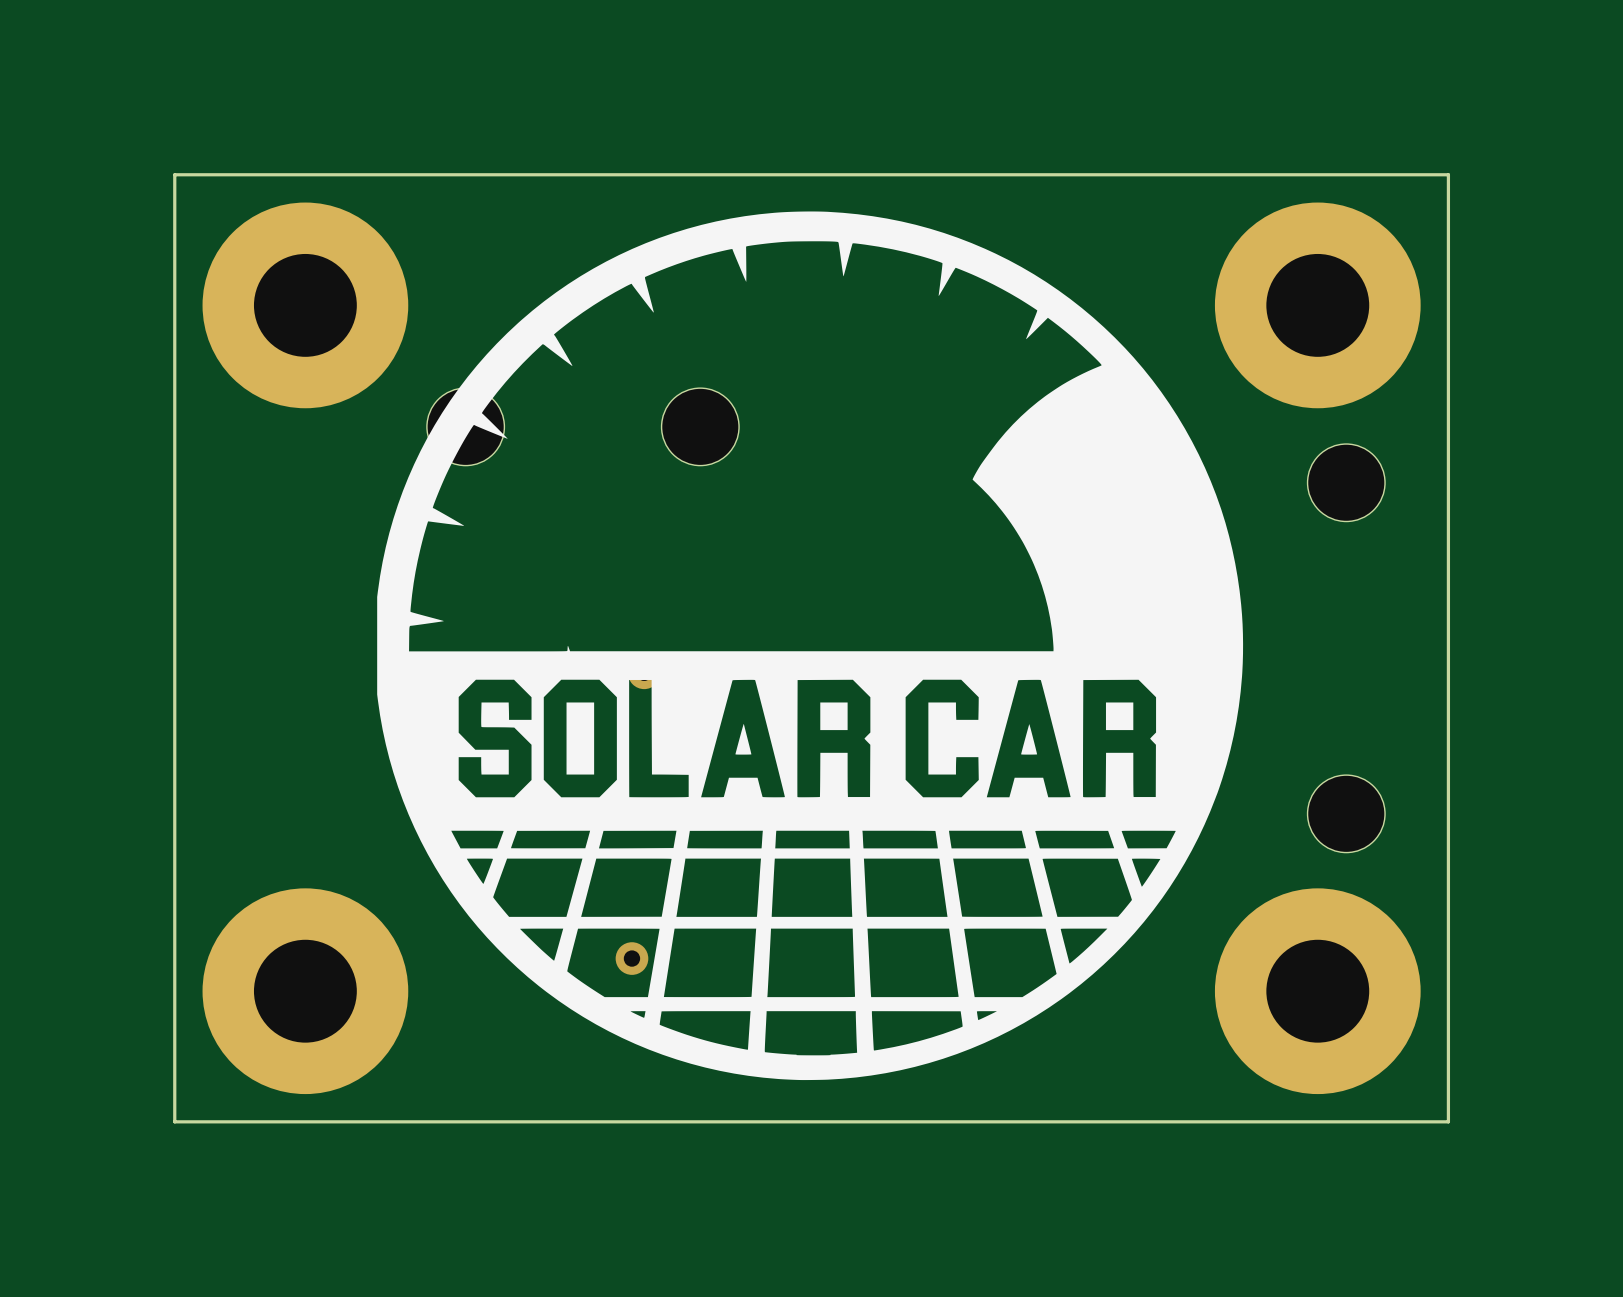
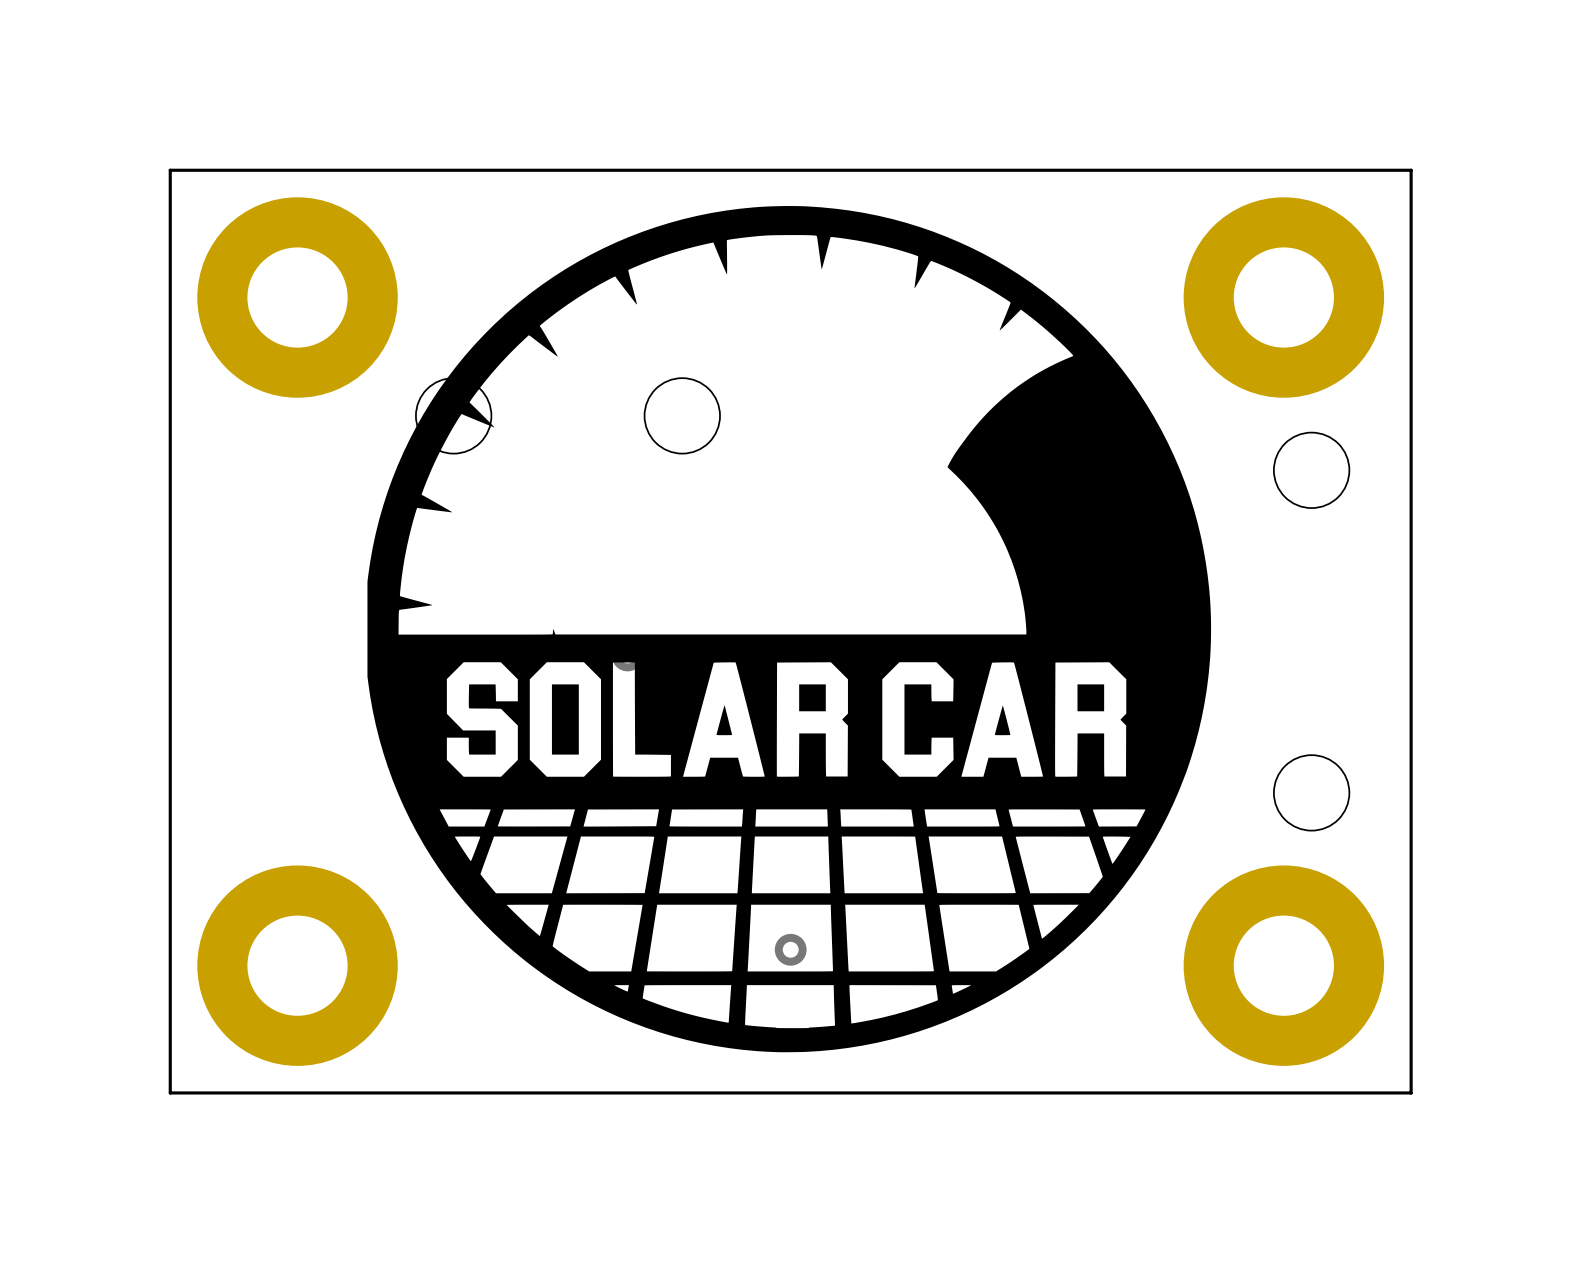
via position: (631, 958) -> (790, 949)

